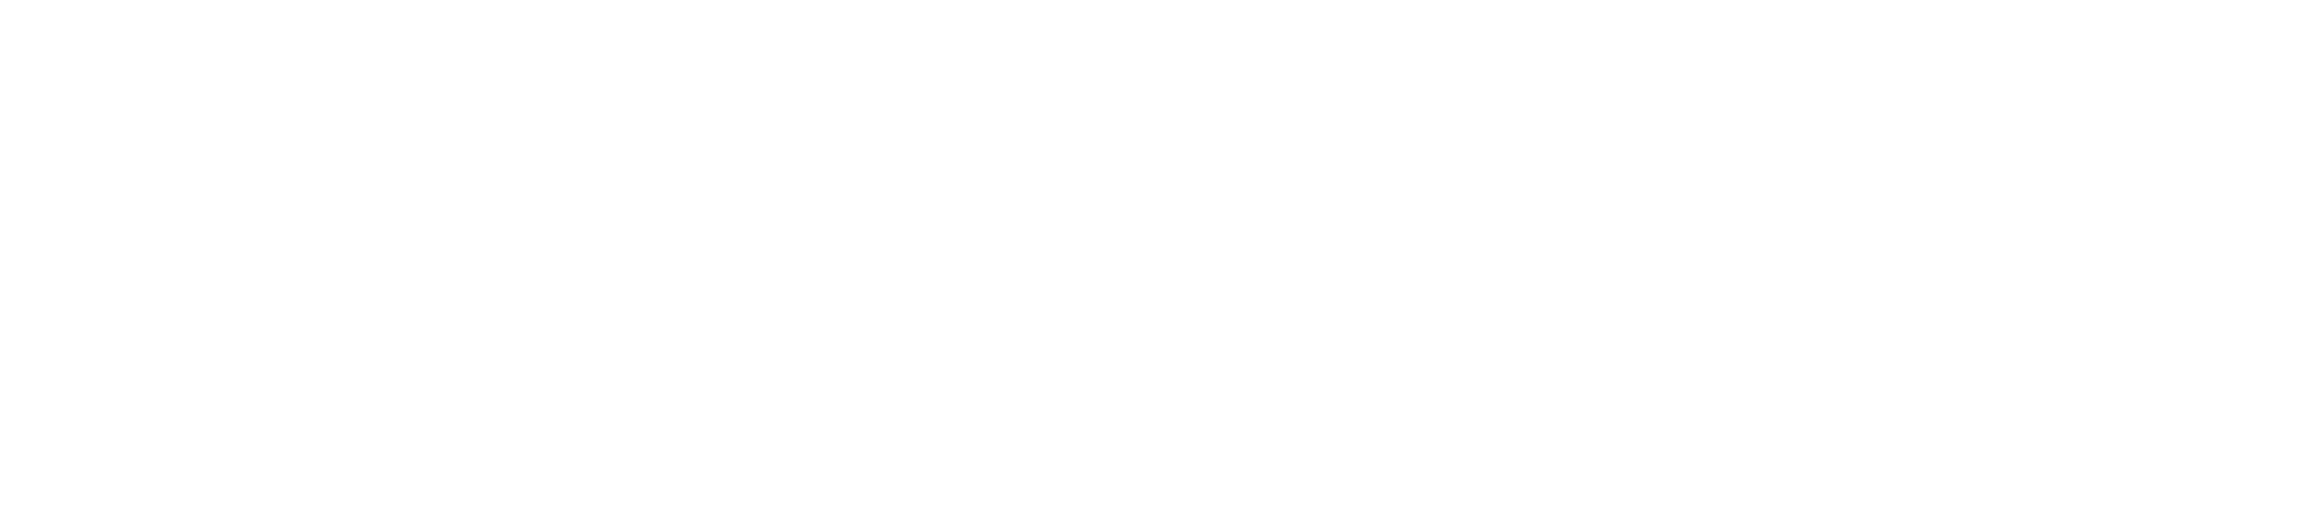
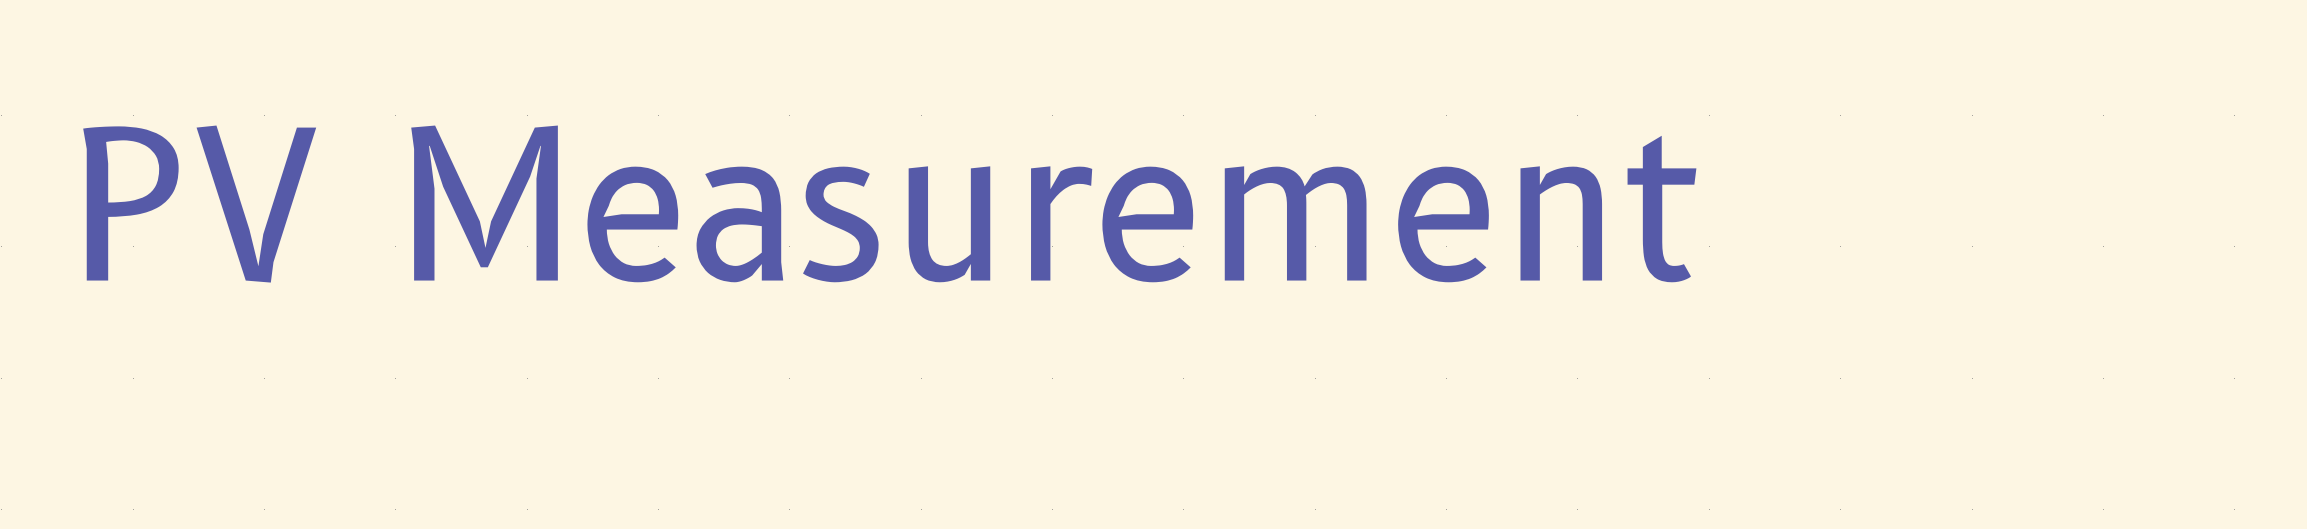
text: none -> PV Measurement (889, 204)

